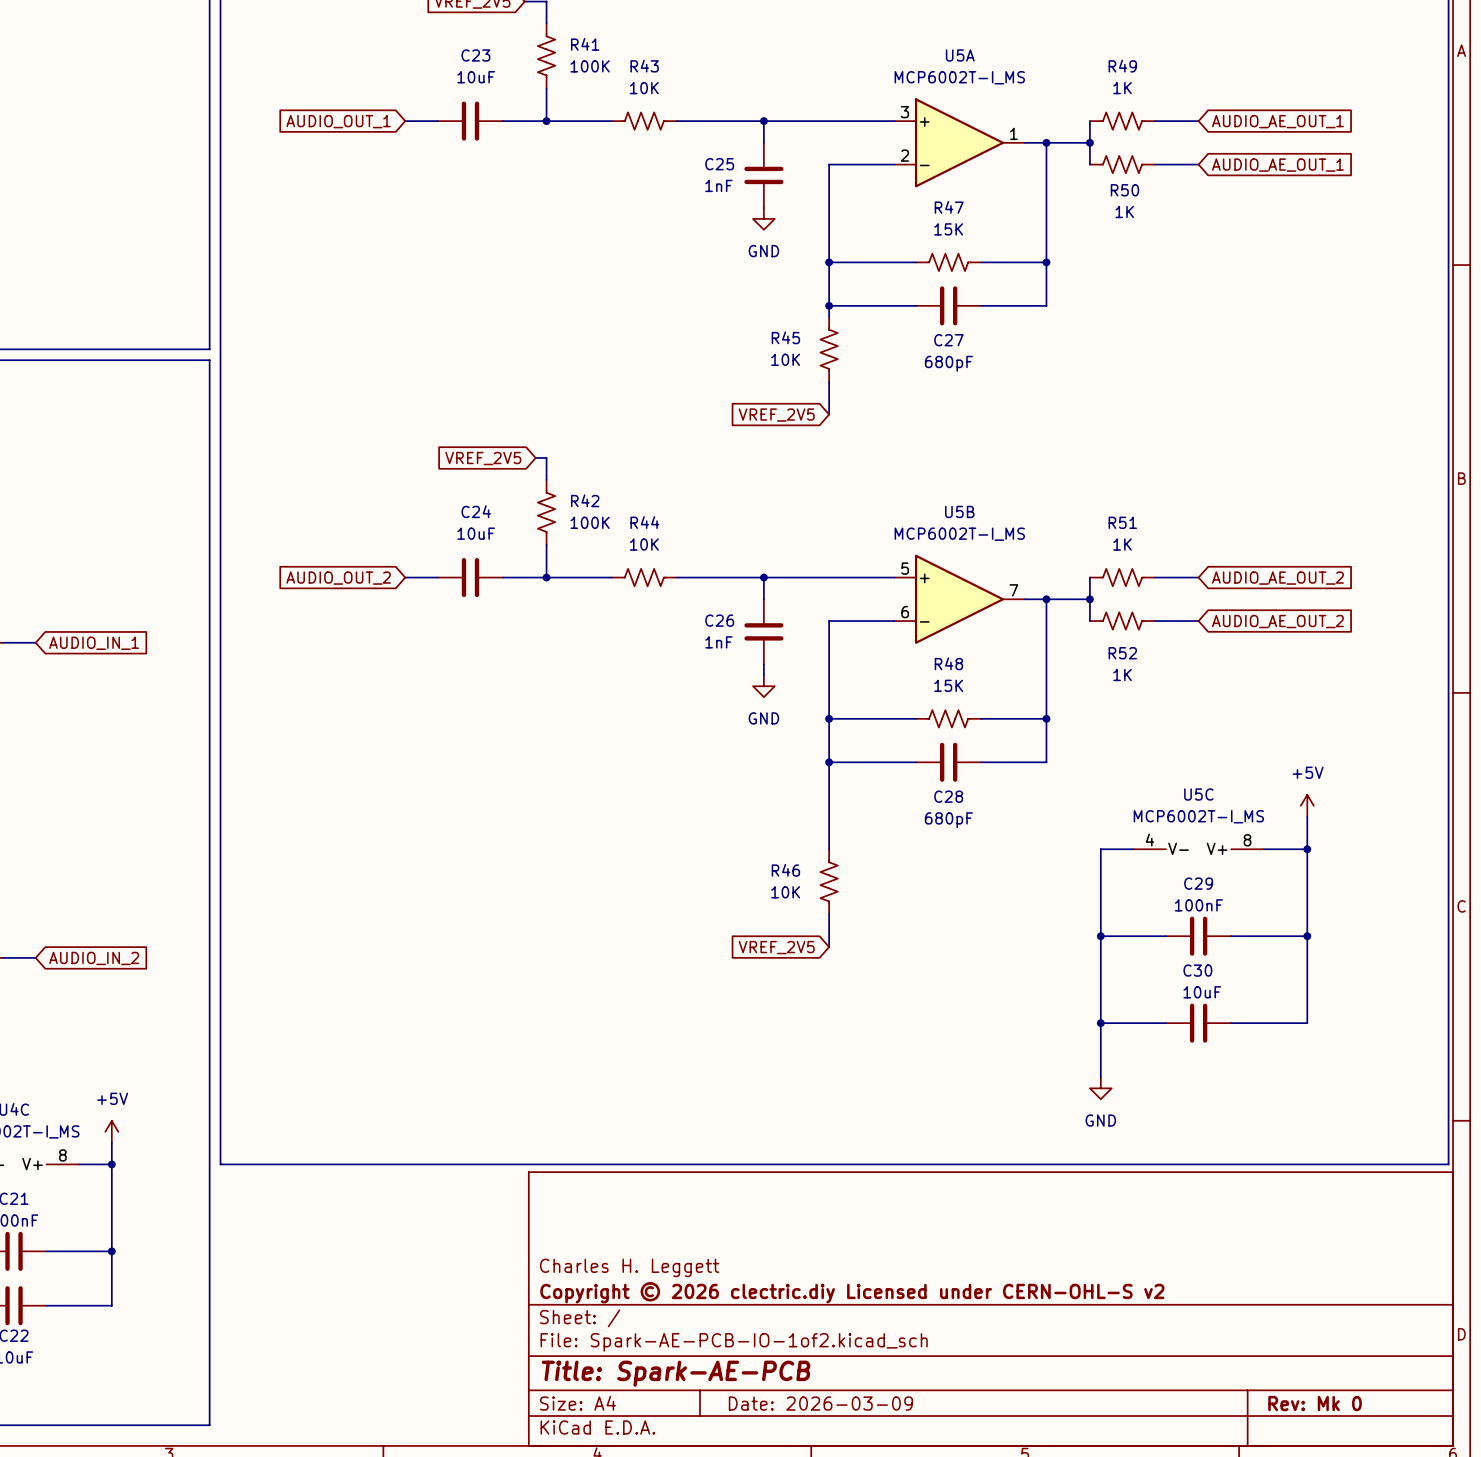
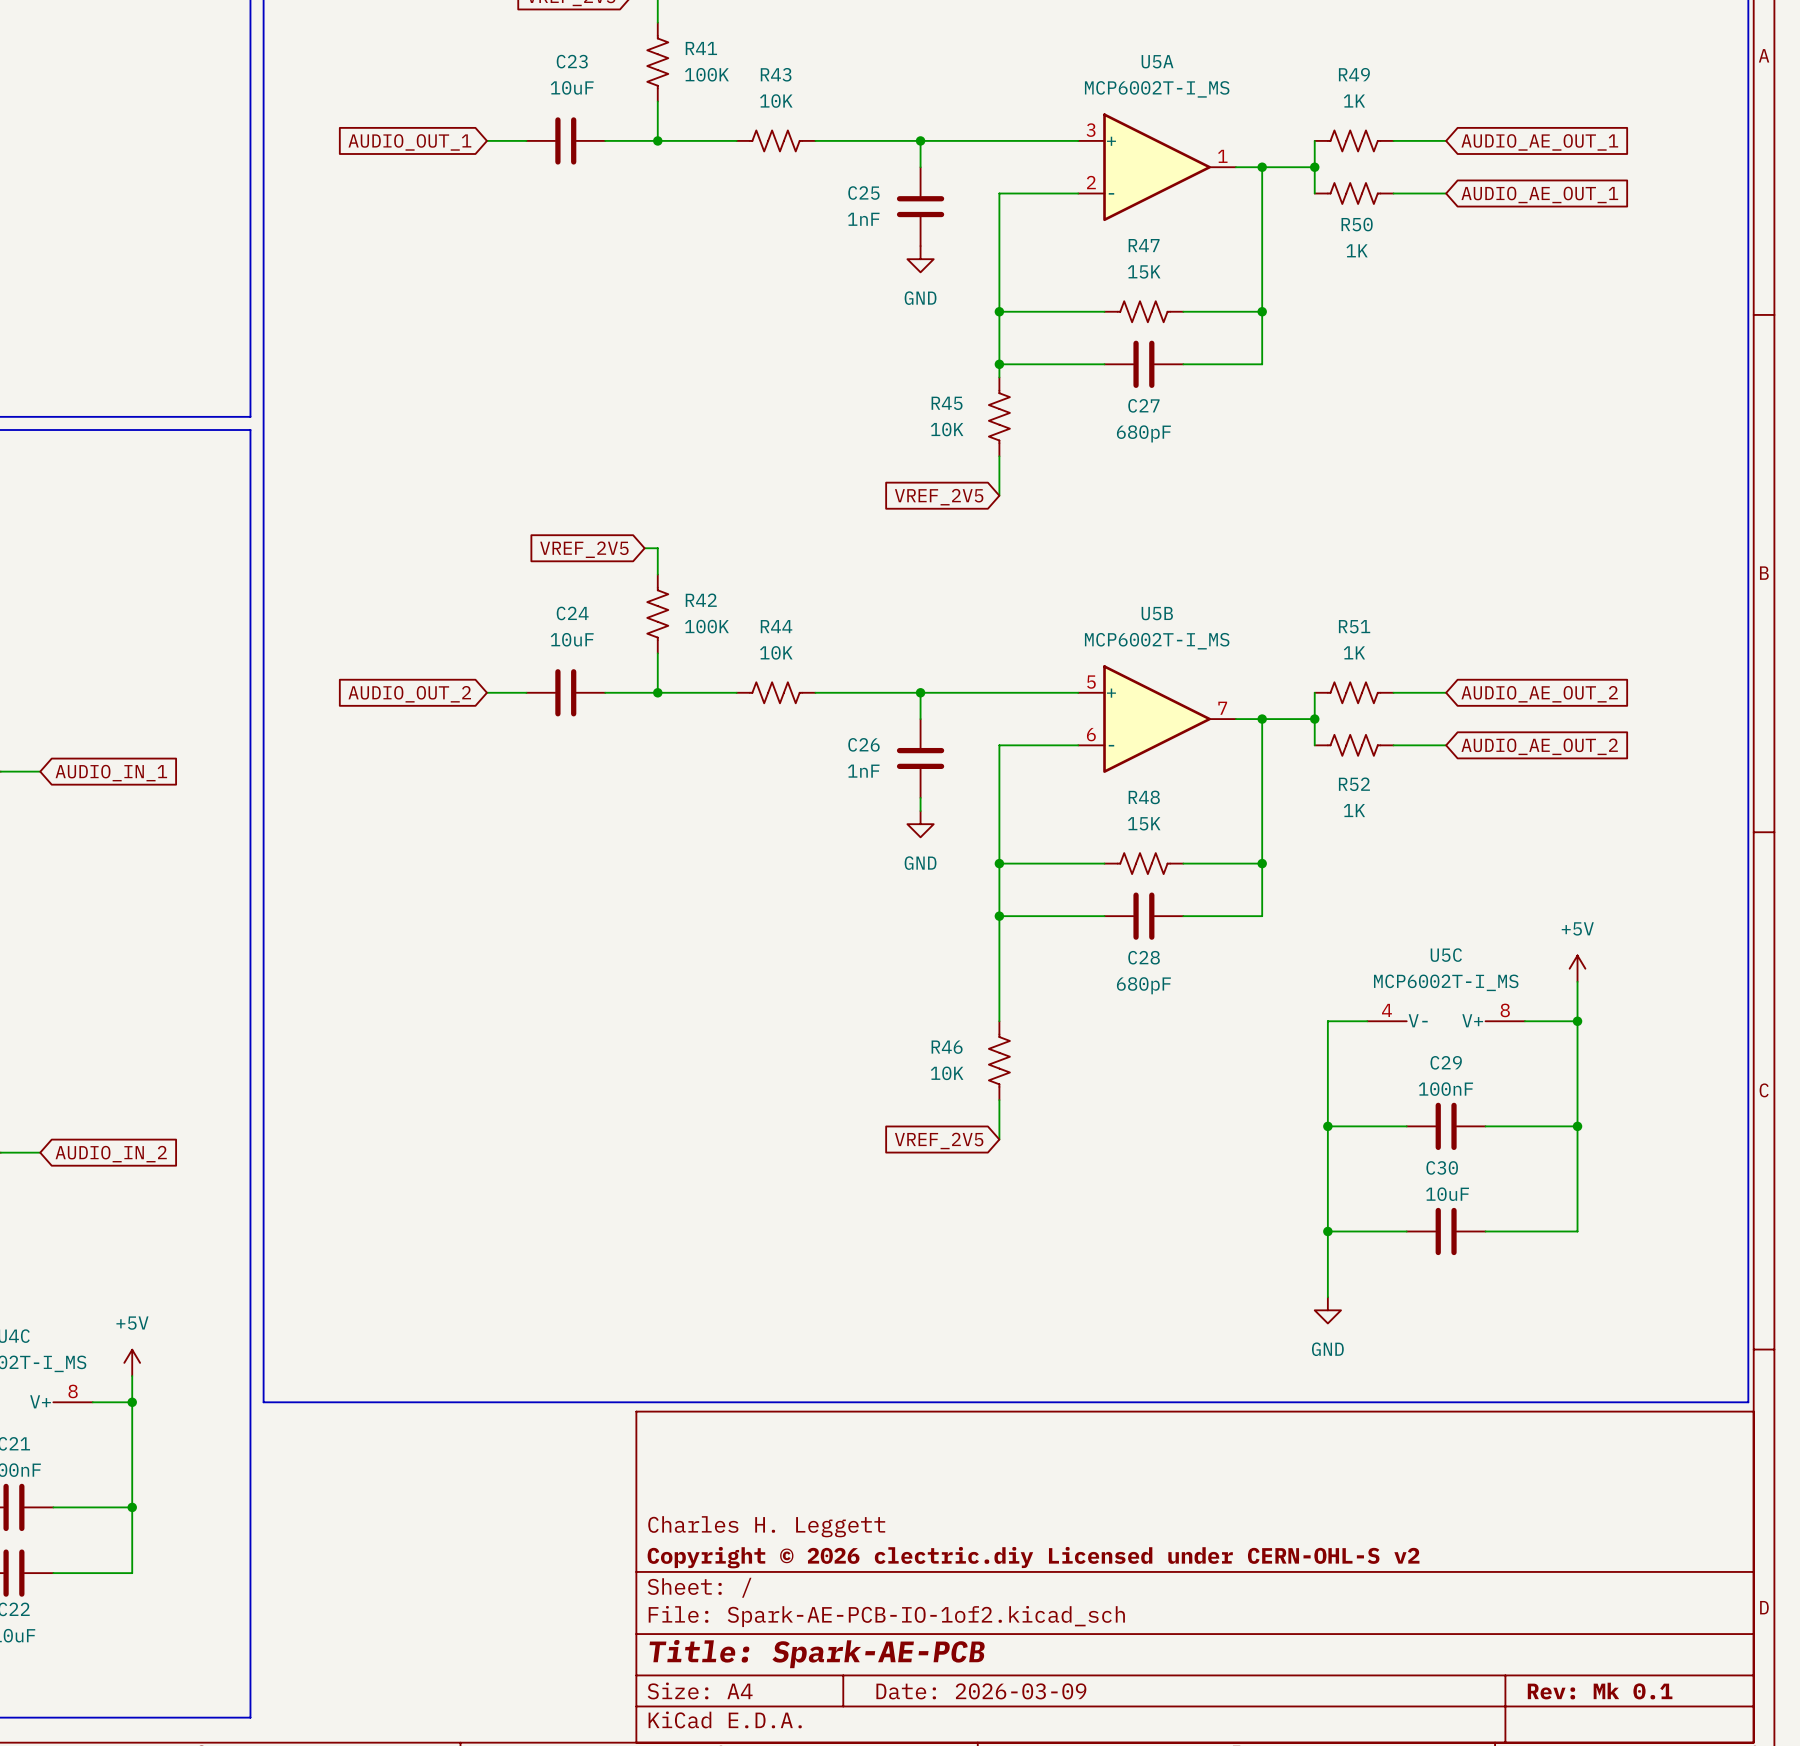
title block: Rev: Mk 0 (1315, 1403) -> Rev: Mk 0.1 (1600, 1691)

